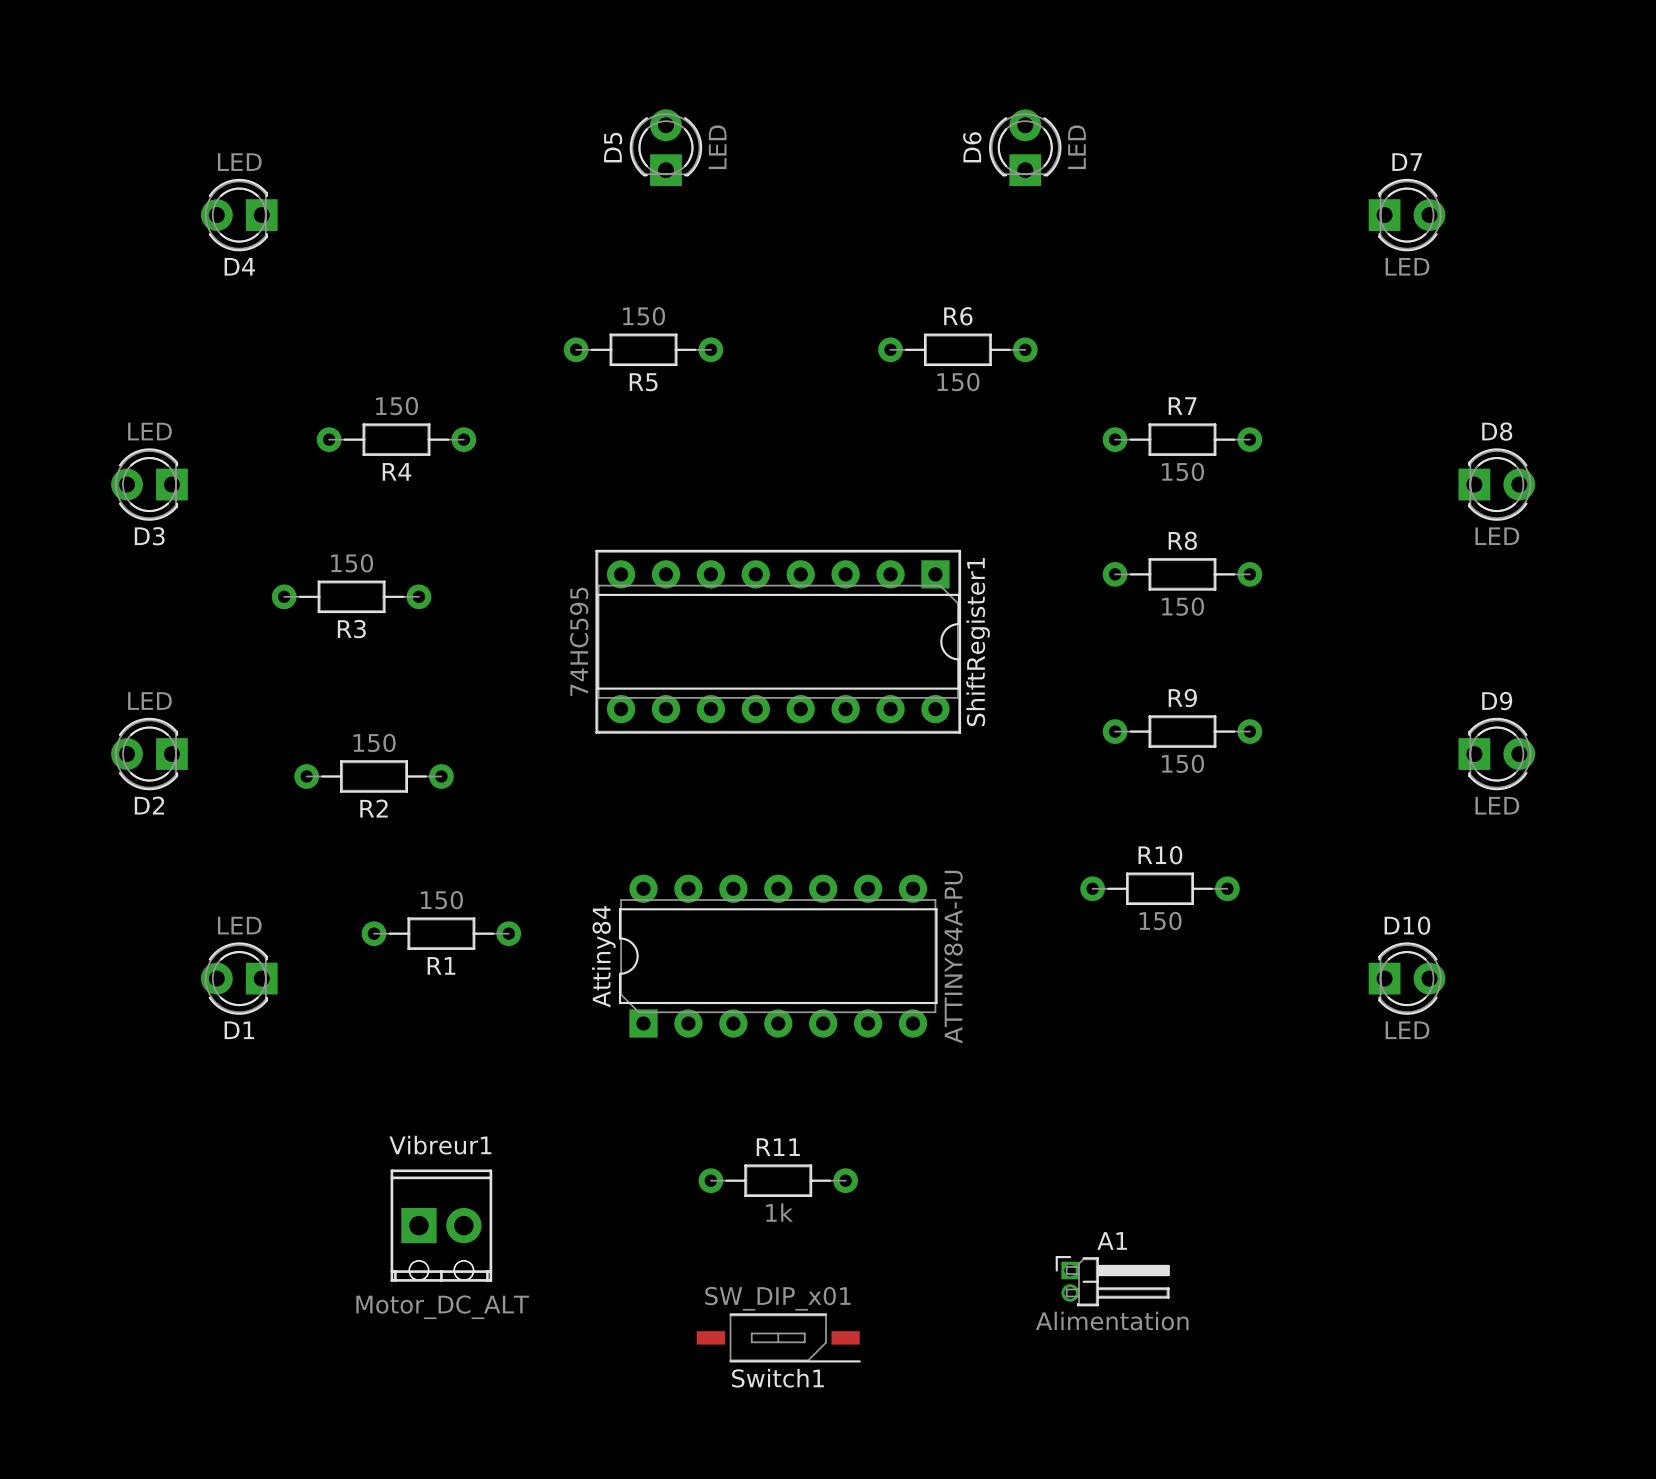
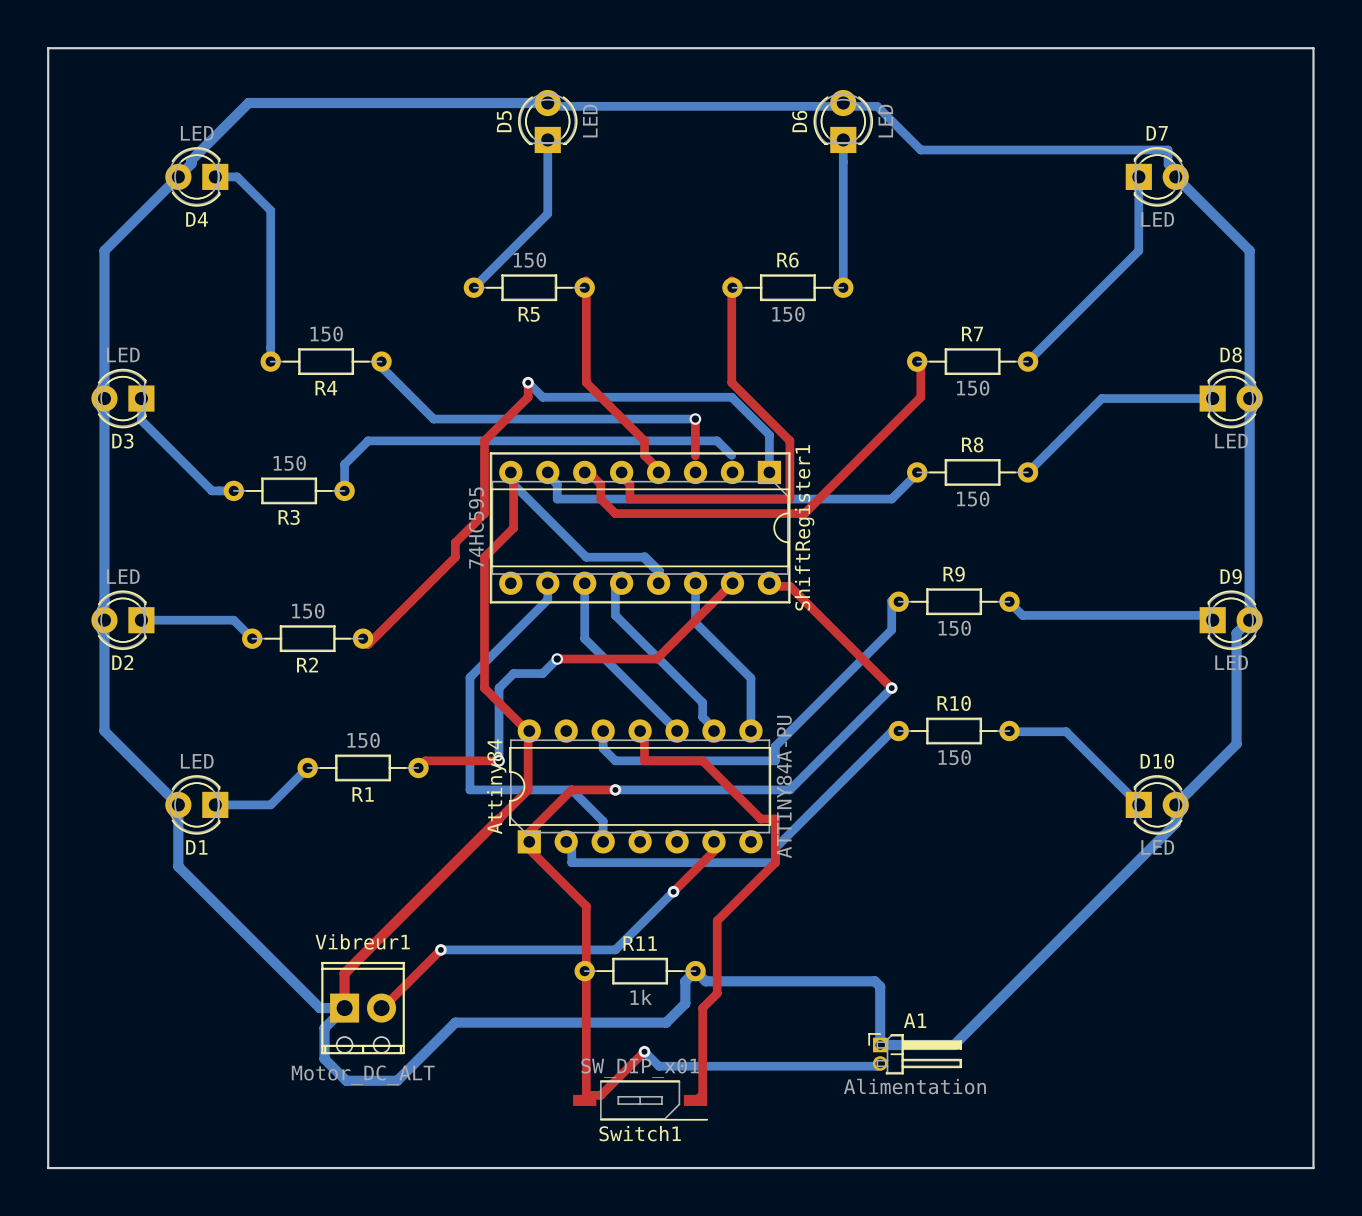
board edge: none -> (48, 48) (1313, 48) (1313, 1168) (48, 1168) (48, 48)
bottom track: none -> (547, 139) (547, 213) (473, 287)
bottom track: none -> (843, 139) (843, 287)
bottom track: none -> (215, 176) (237, 176) (270, 210) (270, 361)
bottom track: none -> (1138, 176) (1138, 250) (1028, 361)
top track: none -> (584, 287) (586, 280) (586, 382) (644, 440) (644, 455) (659, 469) (658, 472)
top track: none -> (732, 287) (731, 280) (731, 382) (789, 440) (789, 499) (629, 499) (629, 484) (615, 469) (621, 472)
bottom track: none -> (381, 361) (382, 368) (433, 419) (695, 419)
top track: none -> (917, 361) (920, 368) (920, 397) (804, 513) (615, 513) (600, 499) (600, 484) (586, 469) (584, 472)
top track: none -> (528, 382) (528, 397) (484, 440) (484, 513) (455, 542) (455, 557) (368, 644) (363, 638)
bottom track: none -> (528, 382) (542, 397) (731, 397) (769, 434) (769, 472)
via: none -> (528, 382)
bottom track: none -> (135, 397) (141, 398) (141, 420) (211, 490) (233, 490)
bottom track: none -> (1211, 397) (1212, 398) (1101, 398) (1028, 472) (1022, 469)
top track: none -> (695, 419) (695, 455)
via: none -> (695, 419)
bottom track: none -> (731, 455) (717, 440) (368, 440) (344, 464) (344, 490)
top track: none -> (510, 472) (513, 469) (513, 528) (484, 557) (484, 688) (528, 731)
bottom track: none -> (510, 472) (513, 469) (513, 484) (586, 557) (644, 557) (659, 571) (659, 586)
bottom track: none -> (547, 472) (542, 469) (557, 484) (557, 499) (891, 499) (920, 469) (917, 472)
bottom track: none -> (547, 583) (547, 599) (469, 677) (469, 789) (571, 789) (603, 821) (603, 841) (600, 848) (600, 833)
bottom track: none -> (584, 583) (584, 638) (677, 731)
bottom track: none -> (621, 583) (615, 586) (615, 615) (702, 702) (702, 717) (717, 731) (714, 731)
bottom track: none -> (695, 583) (695, 622) (750, 678) (750, 731)
top track: none -> (769, 583) (775, 586) (789, 586) (891, 688)
top track: none -> (731, 586) (732, 583) (656, 659) (557, 659)
bottom track: none -> (898, 601) (891, 600) (891, 629) (775, 746) (775, 760) (615, 760) (603, 748) (603, 731)
R9 position: (1182, 731) -> (954, 601)
bottom track: none -> (1009, 601) (1008, 600) (1022, 615) (1211, 615) (1212, 620)
bottom track: none -> (141, 620) (233, 620) (252, 638) (251, 644)
bottom track: none -> (557, 659) (542, 673) (513, 673) (499, 688) (499, 760)
via: none -> (557, 659)
bottom track: none -> (891, 688) (789, 789) (615, 789)
via: none -> (891, 688)
top track: none -> (640, 731) (644, 731) (644, 760) (702, 760) (760, 819) (775, 819) (775, 862) (717, 920) (717, 993) (702, 1008) (702, 1095) (695, 1100)
bottom track: none -> (898, 731) (891, 731) (775, 848) (775, 862) (571, 862) (571, 848) (566, 841)
bottom track: none -> (1009, 731) (1008, 731) (1066, 731) (1138, 804)
top track: none -> (528, 731) (528, 789) (344, 973) (344, 1008) (339, 1008)
top track: none -> (499, 760) (425, 760) (418, 767)
via: none -> (499, 760)
bottom track: none -> (307, 767) (270, 804) (215, 804)
top track: none -> (615, 789) (571, 789) (528, 833) (528, 848)
via: none -> (615, 789)
top track: none -> (714, 841) (717, 848) (673, 891)
top track: none -> (528, 848) (586, 906) (586, 1095)
bottom track: none -> (673, 891) (615, 949) (440, 949)
via: none -> (673, 891)
top track: none -> (440, 949) (381, 1008)
via: none -> (440, 949)
bottom track: none -> (344, 1008) (324, 1028) (324, 1058) (346, 1080) (397, 1080) (455, 1022) (666, 1022) (685, 1003) (685, 981) (695, 971) (705, 981) (874, 981) (880, 986) (880, 1045) (954, 1045) (1175, 823) (1175, 804) (1236, 744) (1236, 633) (1249, 620) (1249, 250) (1175, 176) (1182, 179) (1168, 164) (1168, 150) (920, 150) (877, 106) (542, 106) (547, 103) (248, 103) (191, 160) (191, 163) (104, 250) (104, 731) (178, 804) (178, 866) (319, 1008) (344, 1008)
top track: none -> (644, 1051) (600, 1095) (586, 1095)
bottom track: none -> (644, 1051) (659, 1066) (877, 1066) (880, 1063)
via: none -> (644, 1051)

